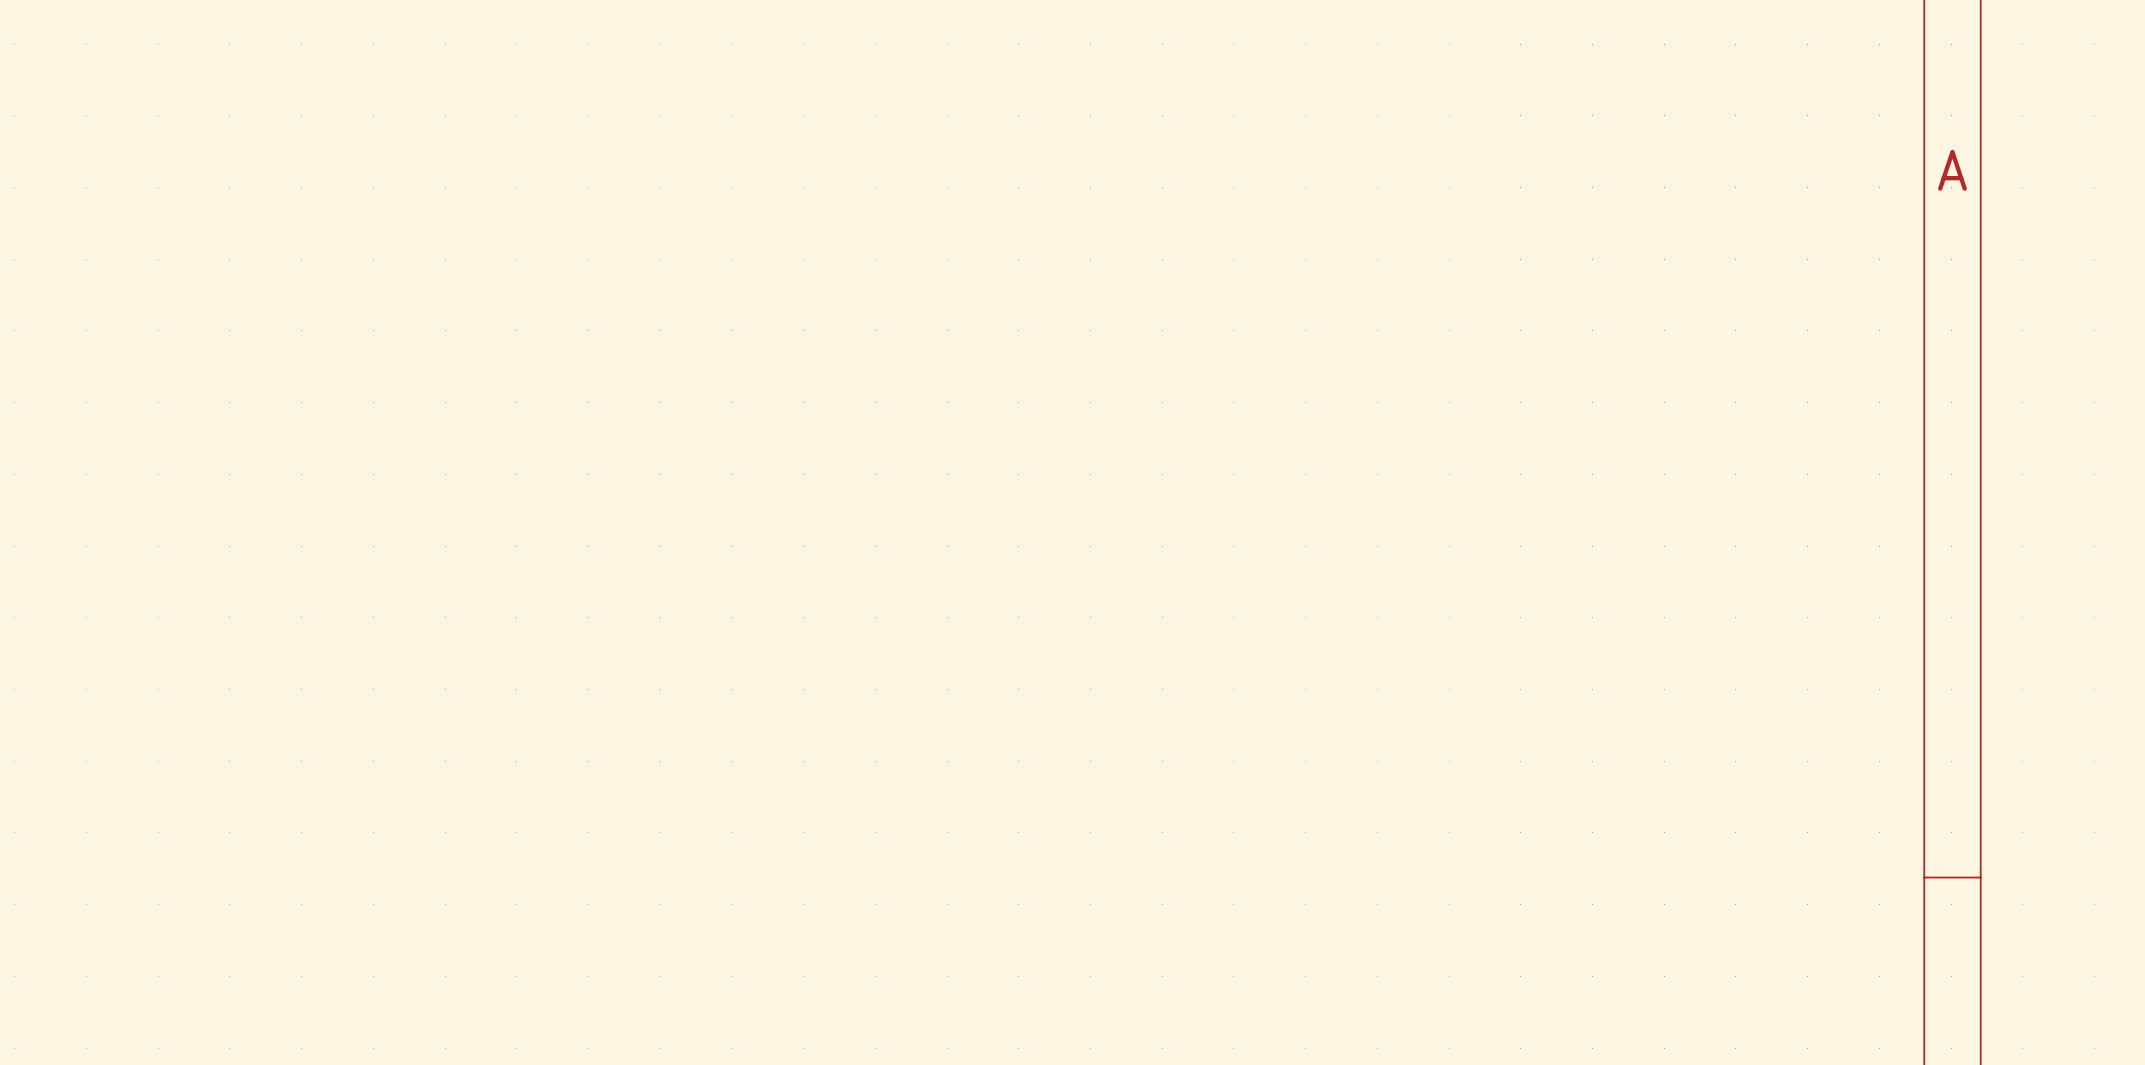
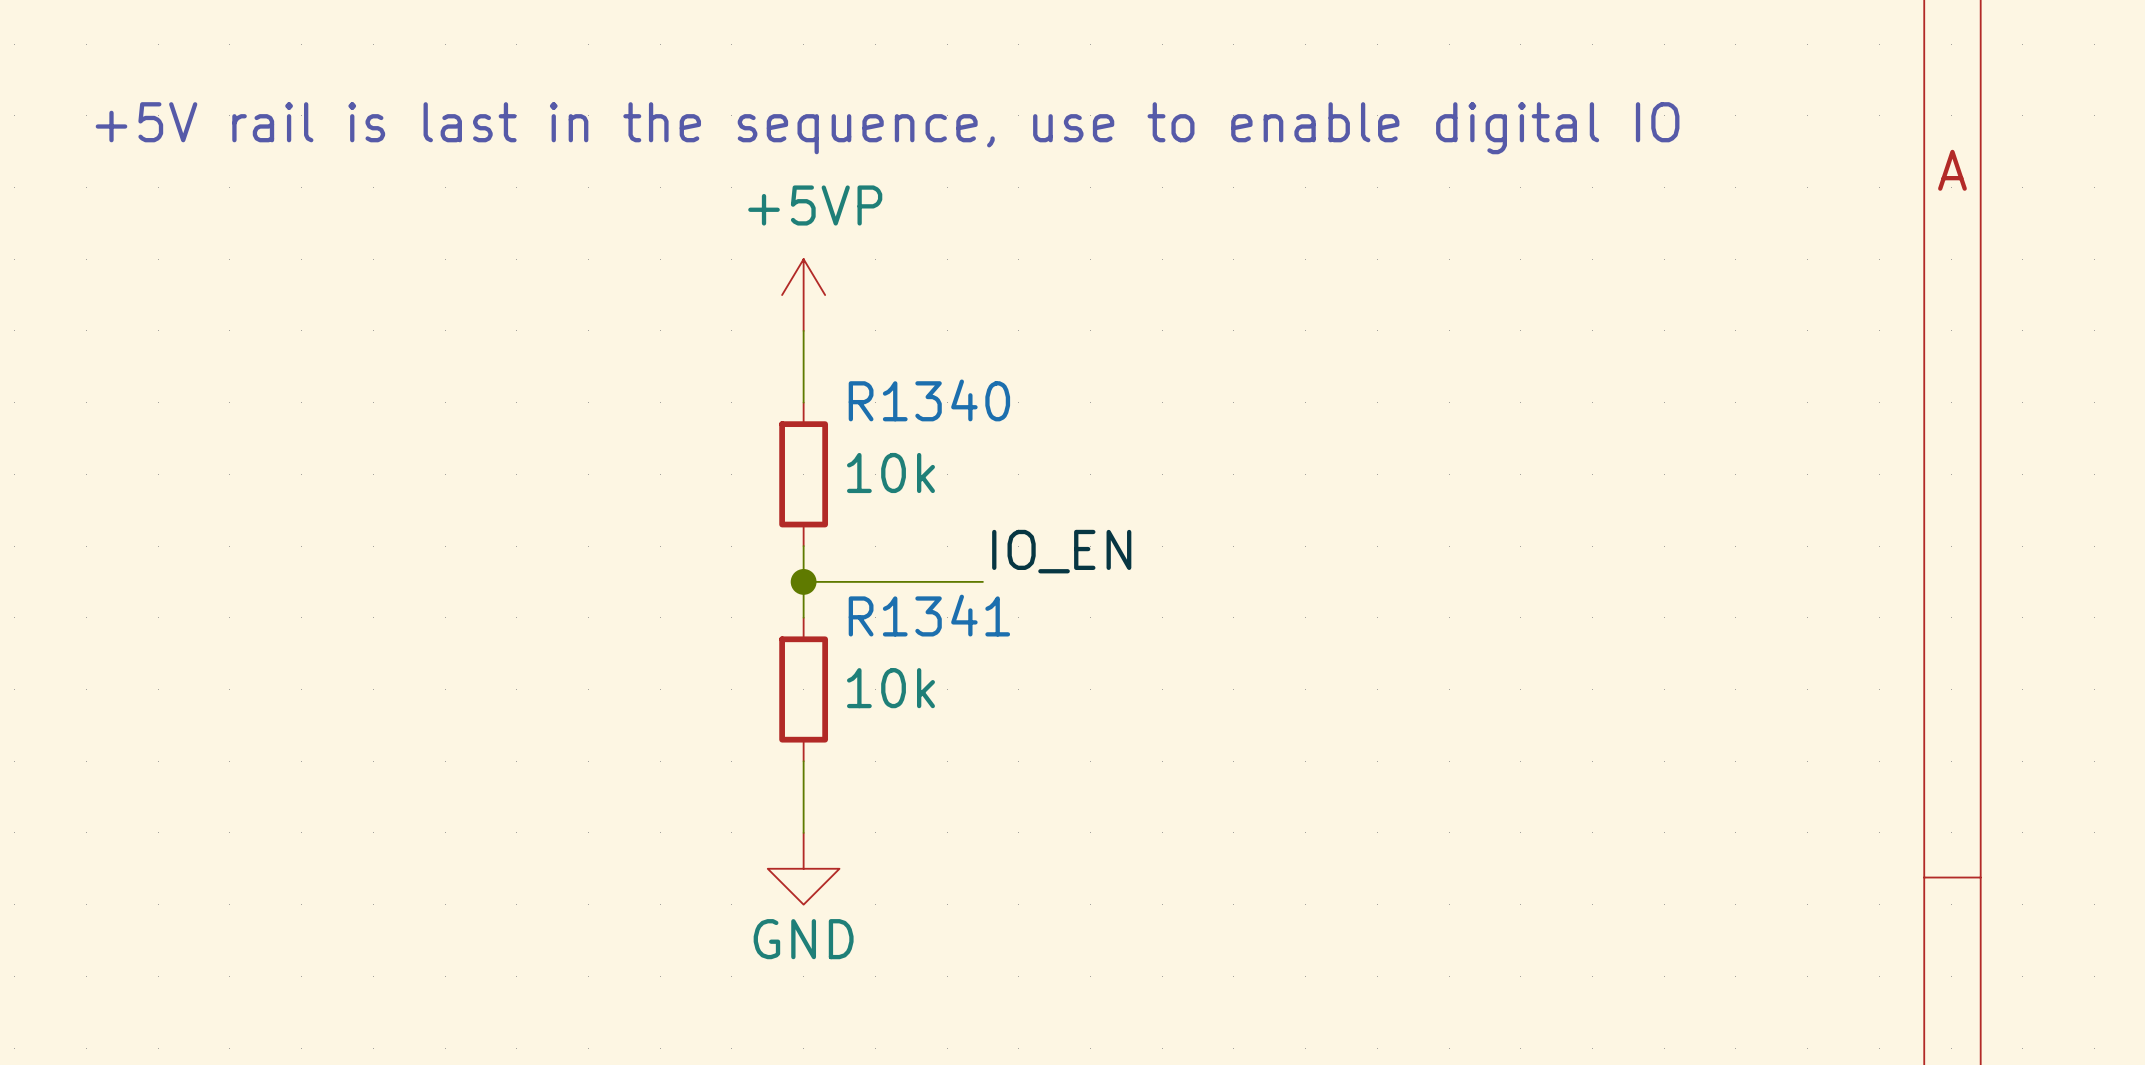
text: none -> +5V rail is last in the sequence, use to enable digital IO (887, 128)
power symbol: none -> +5VP (803, 295)
wire: none -> (803, 330) (803, 402)
R1340: none -> 10k (803, 474)
wire: none -> (803, 546) (803, 617)
label: none -> IO_EN (1061, 551)
wire: none -> (803, 581) (982, 581)
junction: none -> (803, 581)
R1341: none -> 10k (803, 689)
wire: none -> (803, 761) (803, 832)
power symbol: none -> GND (803, 868)

